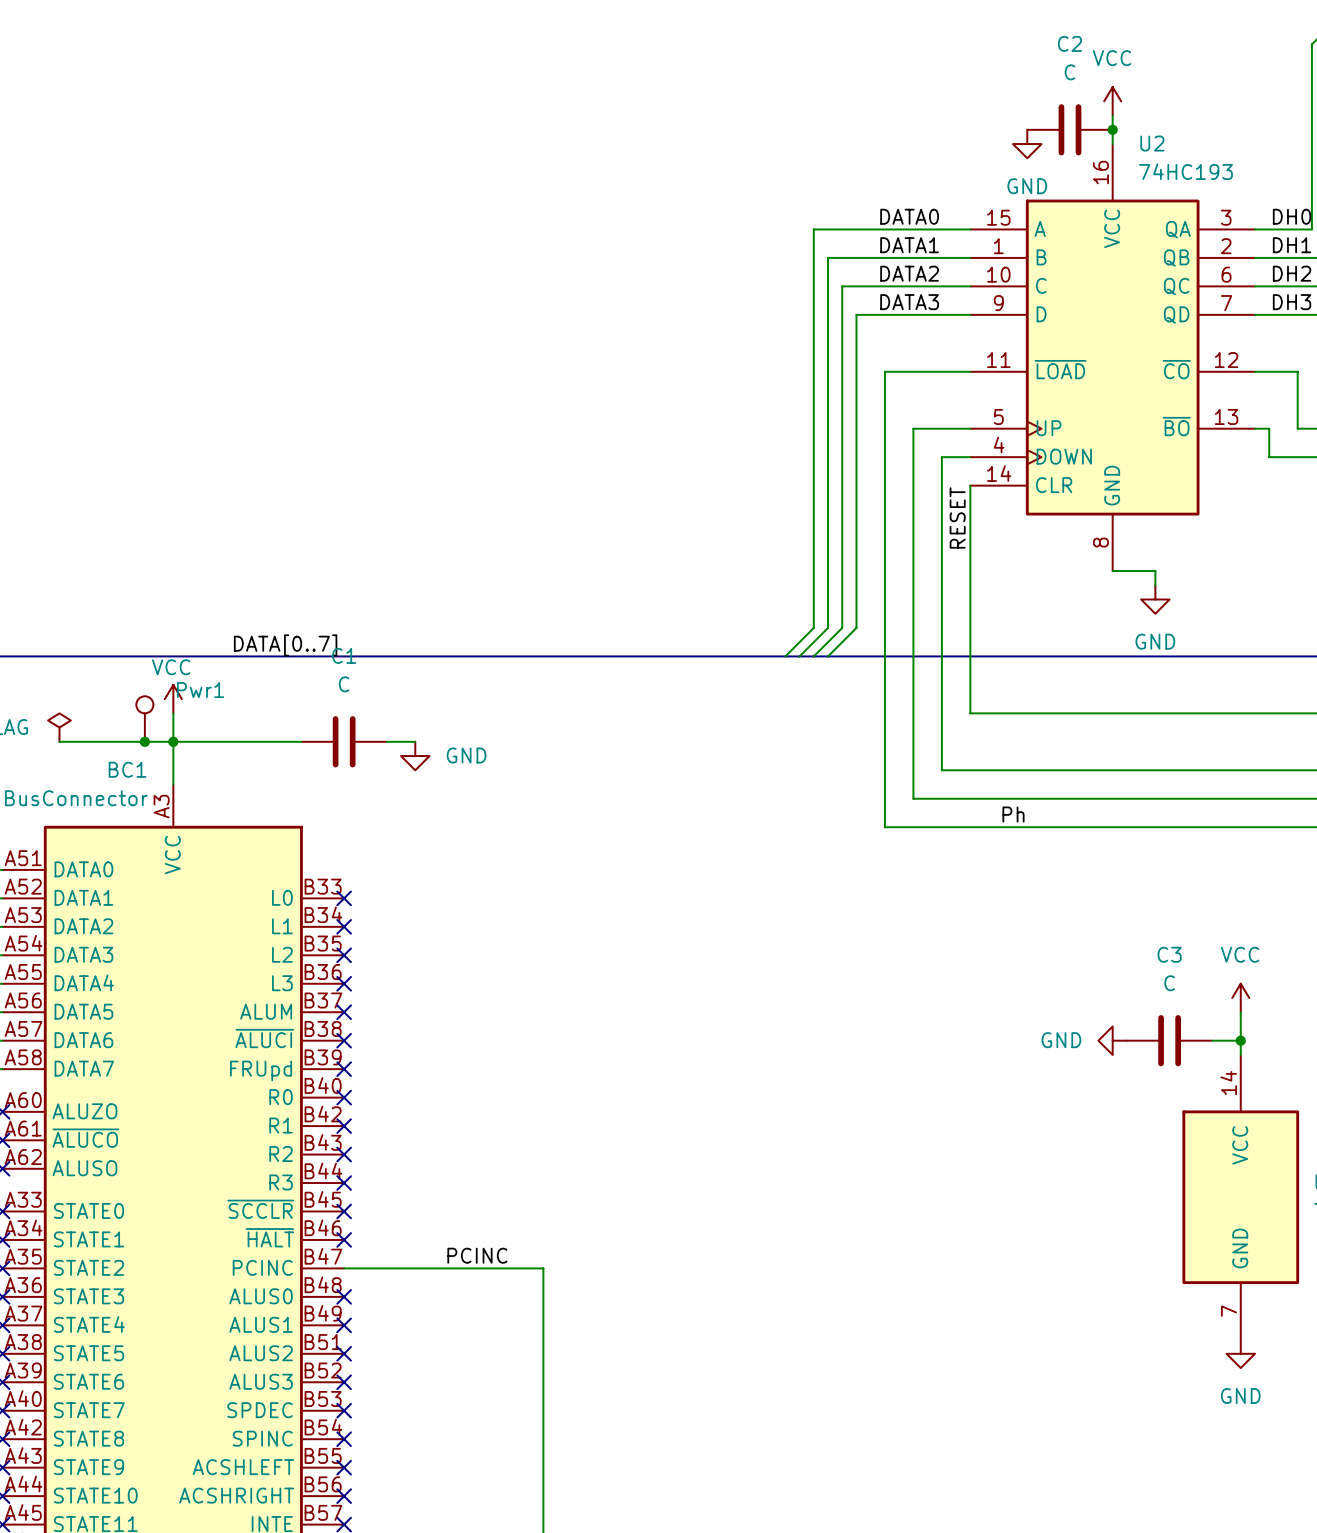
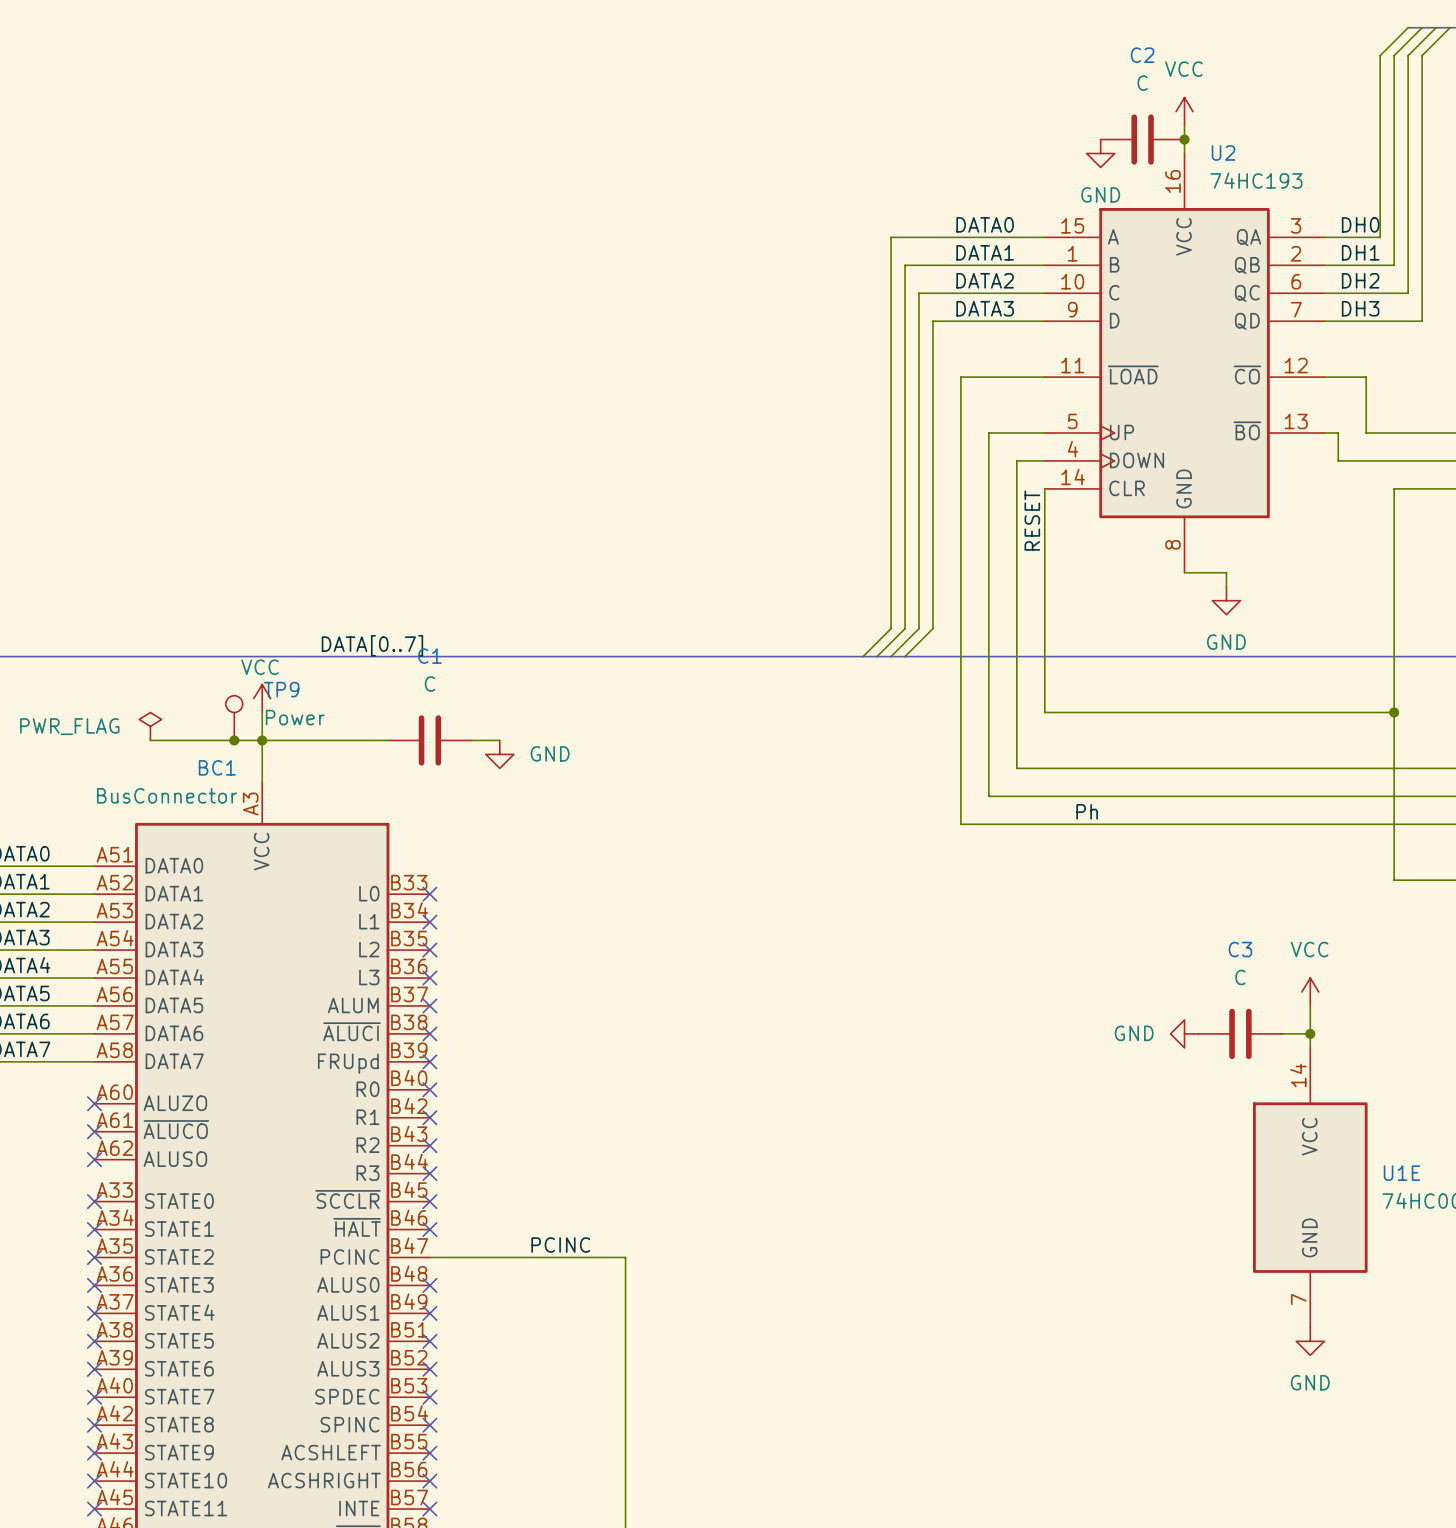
Pwr1 name: Pwr1 (200, 690) -> TP9 (281, 689)
Pwr1 value: none -> Power (295, 717)

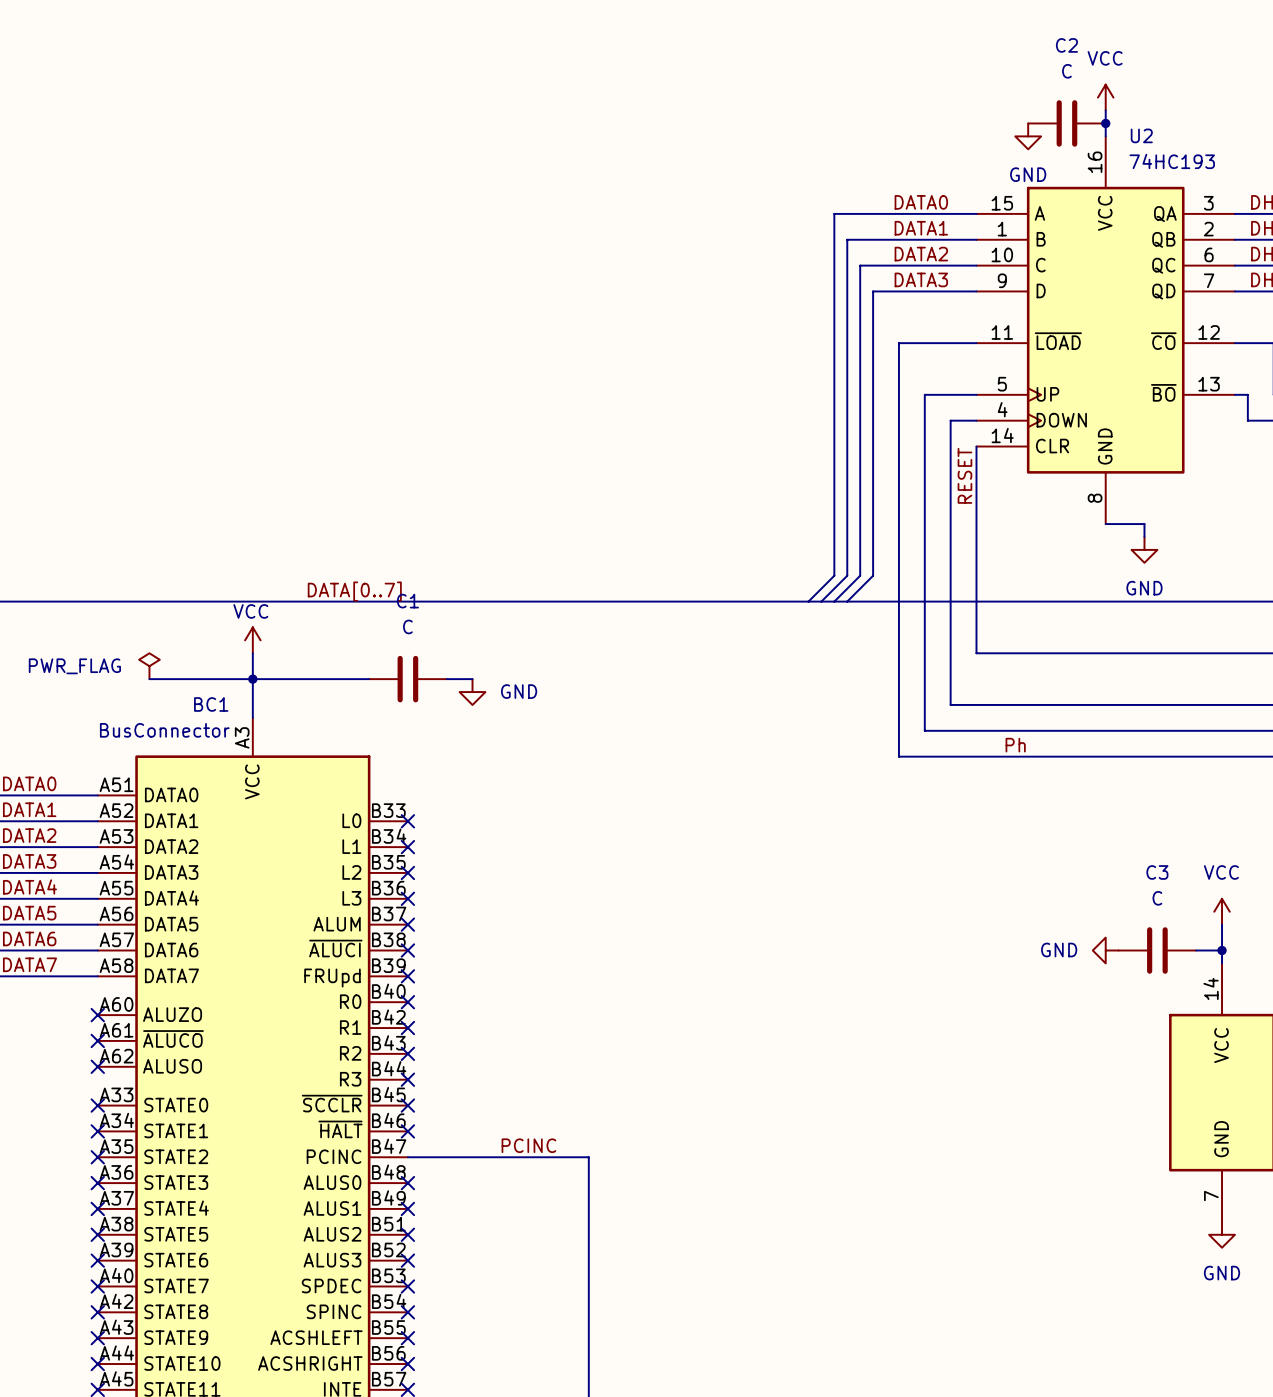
TP9: Power (234, 718) -> none
junction: (234, 740) -> none

